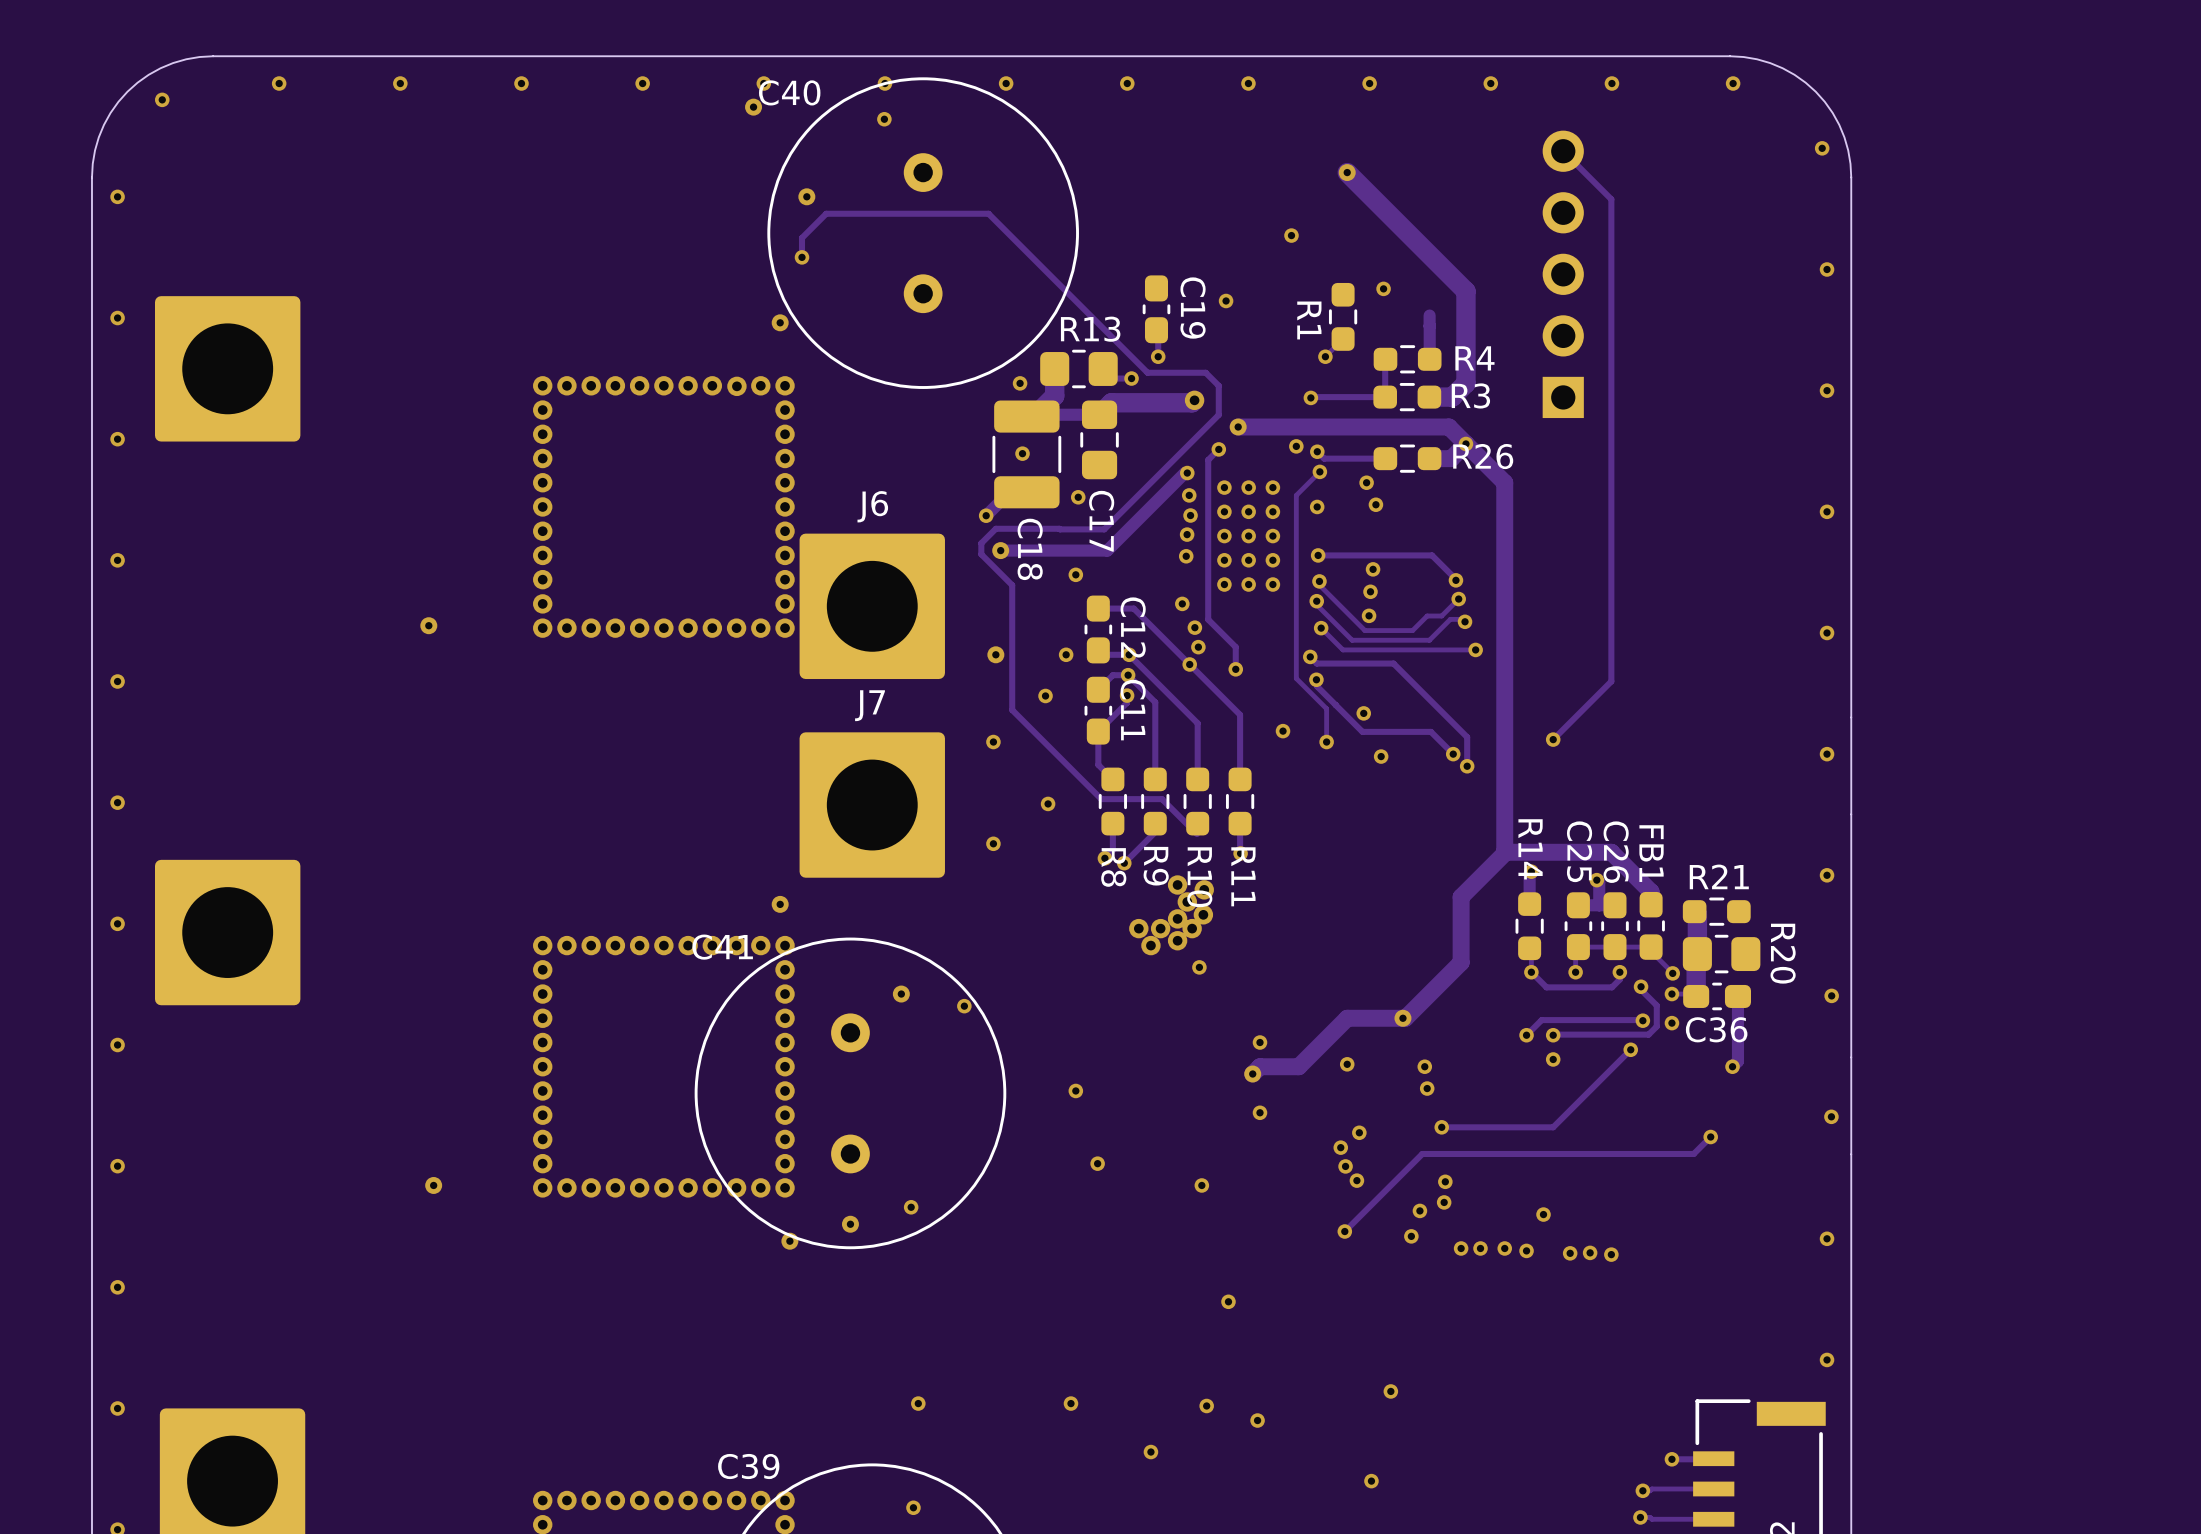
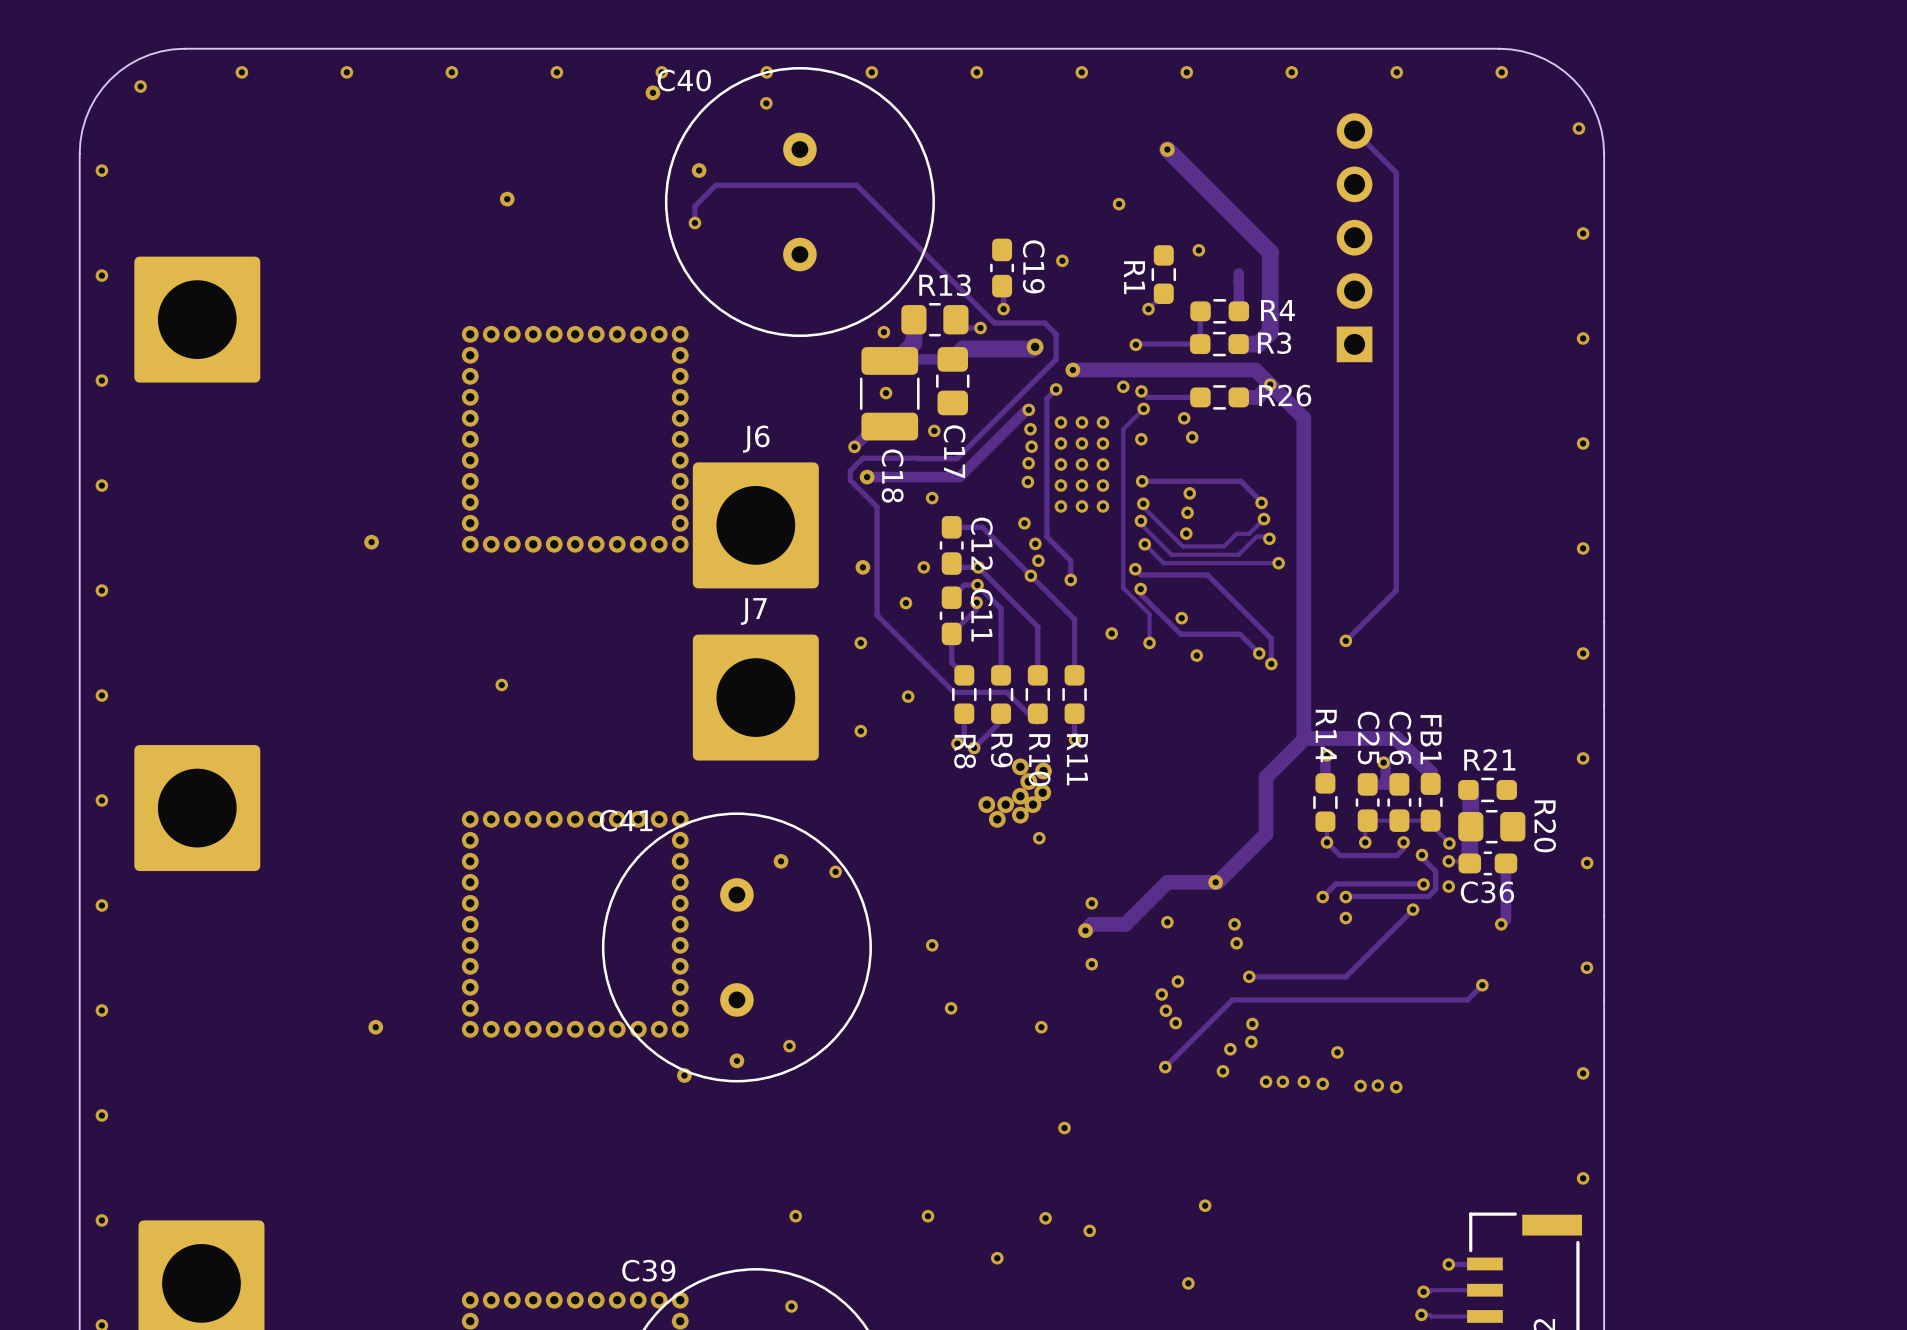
via: none -> (507, 199)
via: (780, 322) -> none
via: none -> (501, 684)
via: (780, 904) -> none

